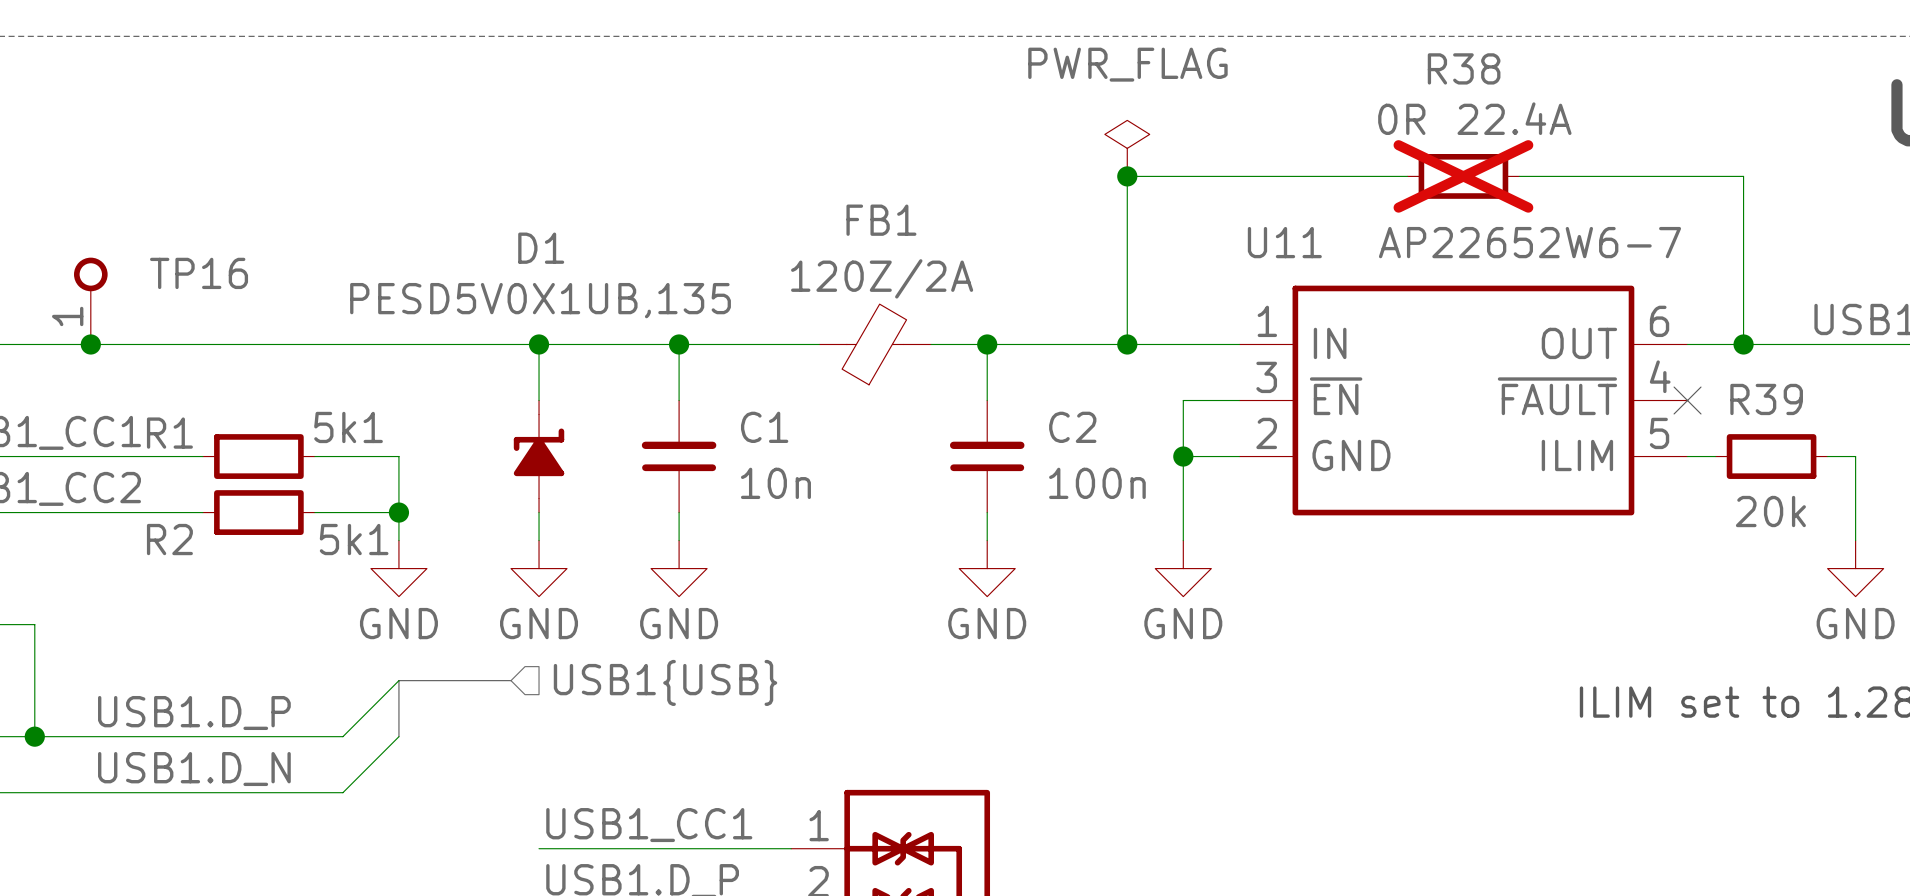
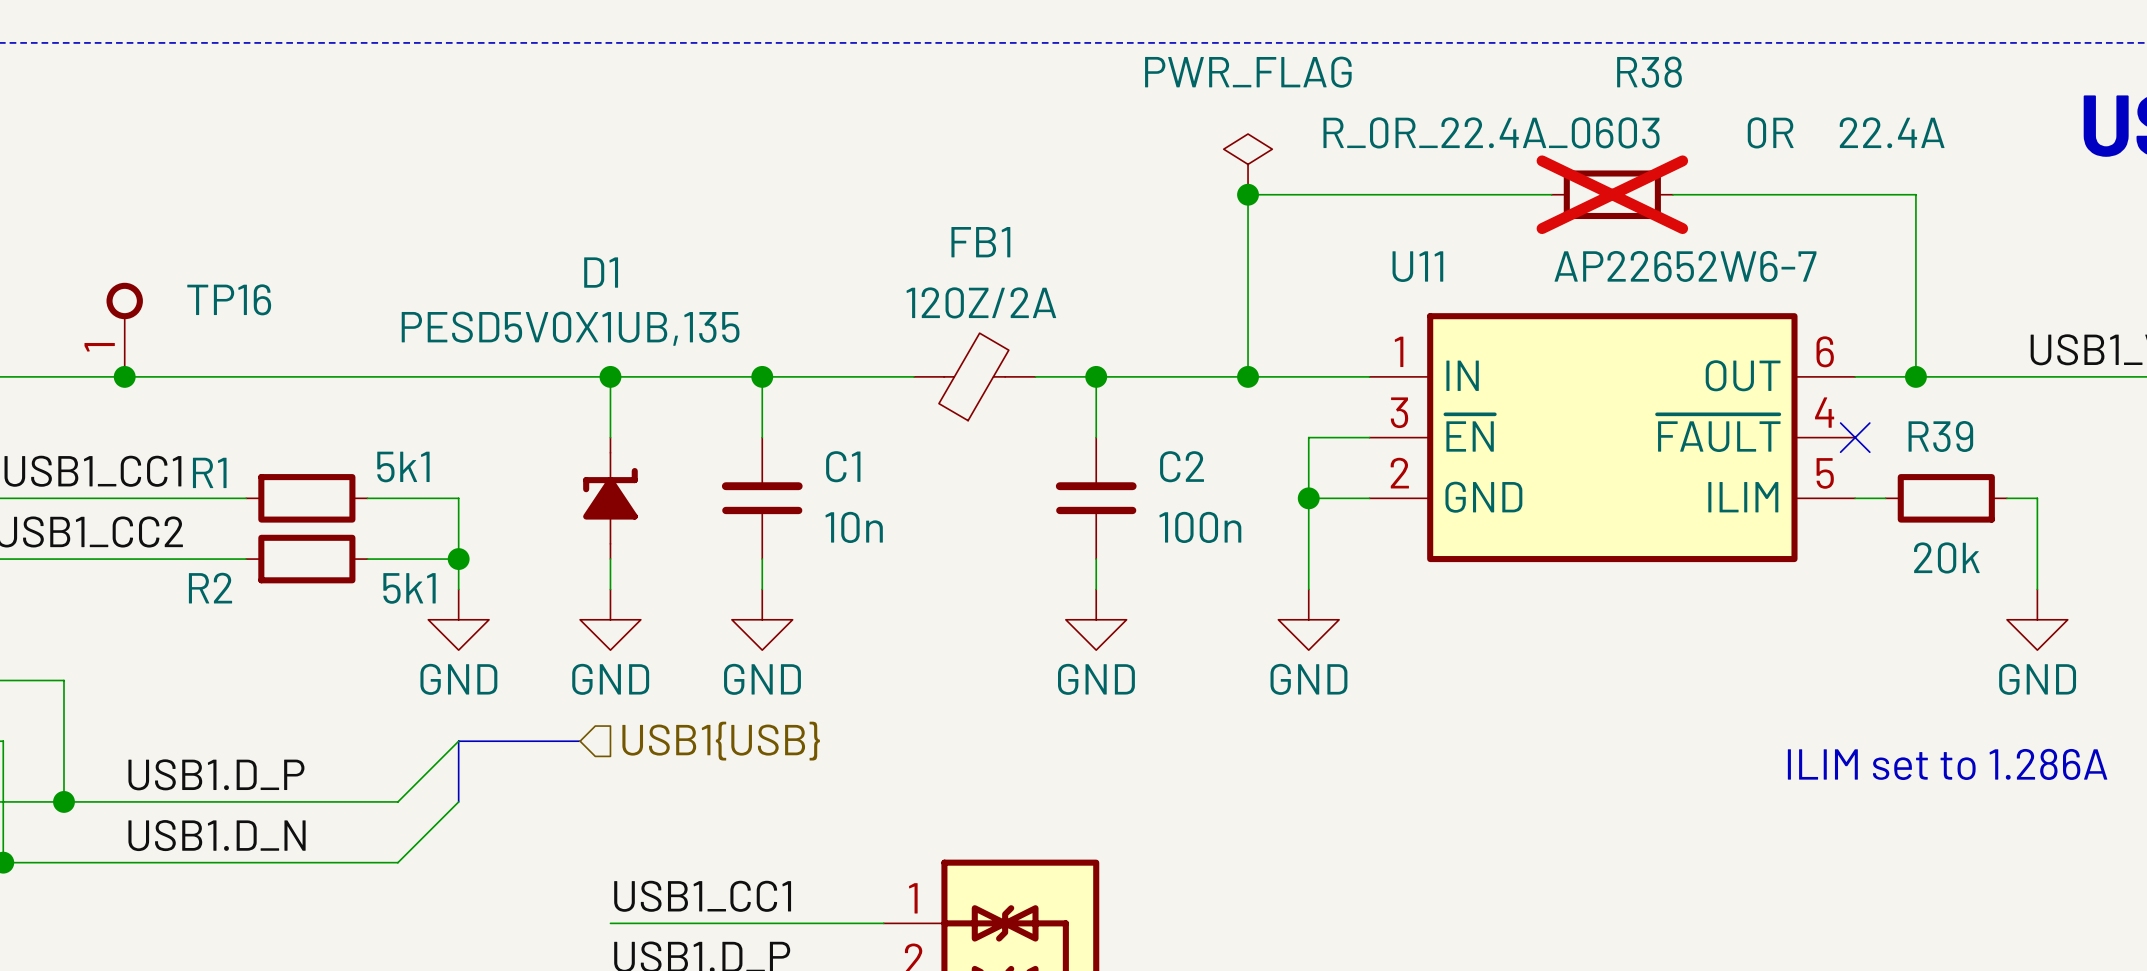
R38 name position: R38 (1464, 68) -> R38 (1649, 72)
R38 text position: 22.4A (1514, 118) -> 22.4A (1892, 132)
R38 text position: 0R (1401, 119) -> 0R (1770, 132)
R38 value: none -> R_0R_22.4A_0603 (1491, 132)

